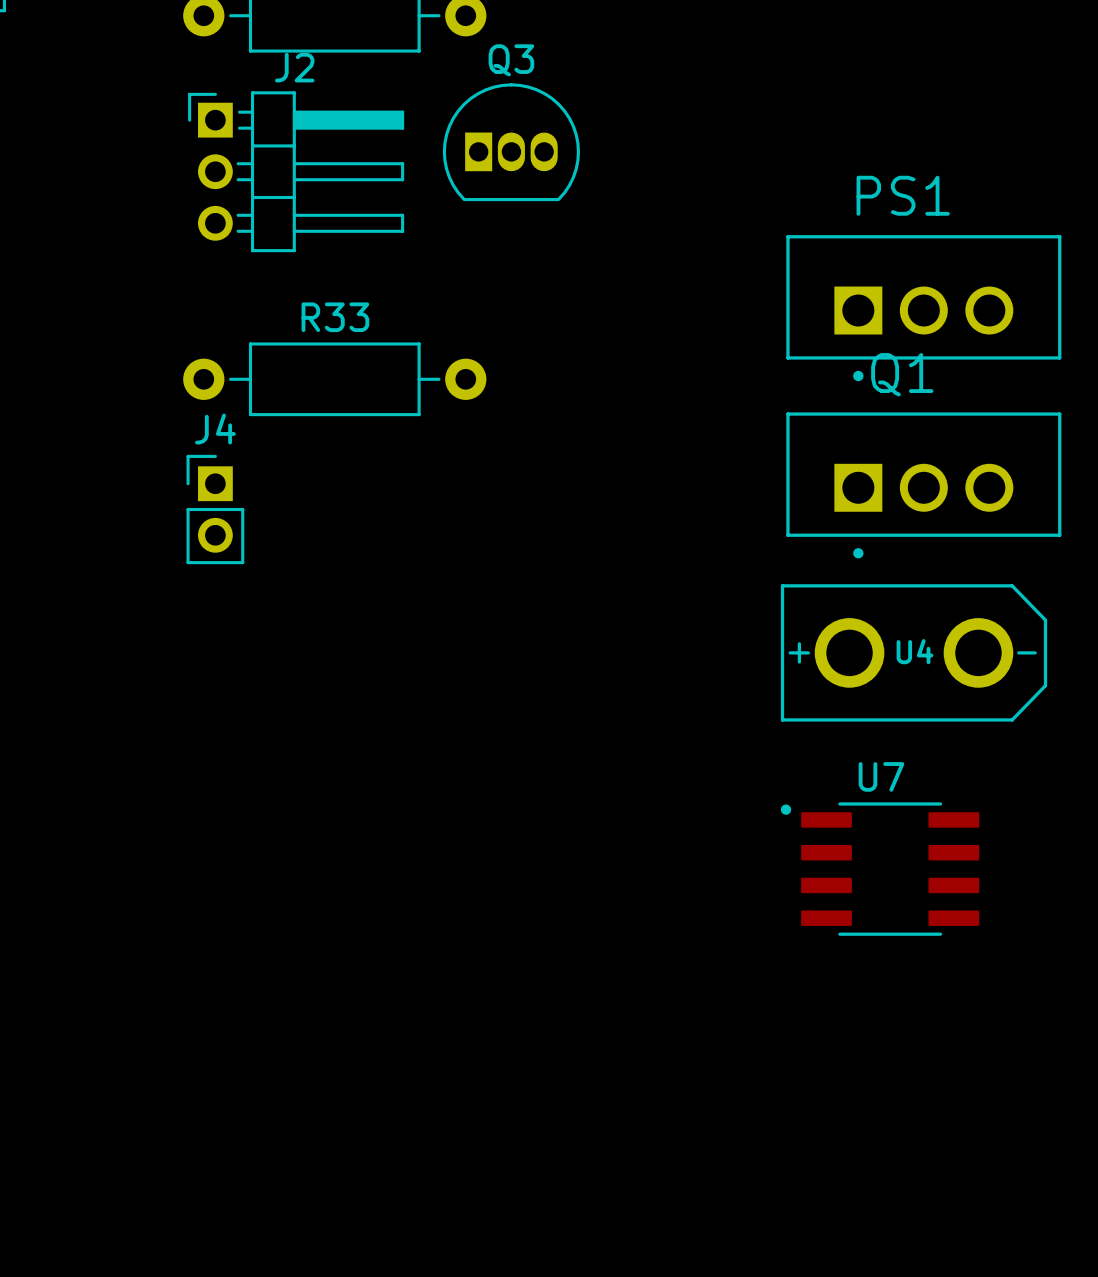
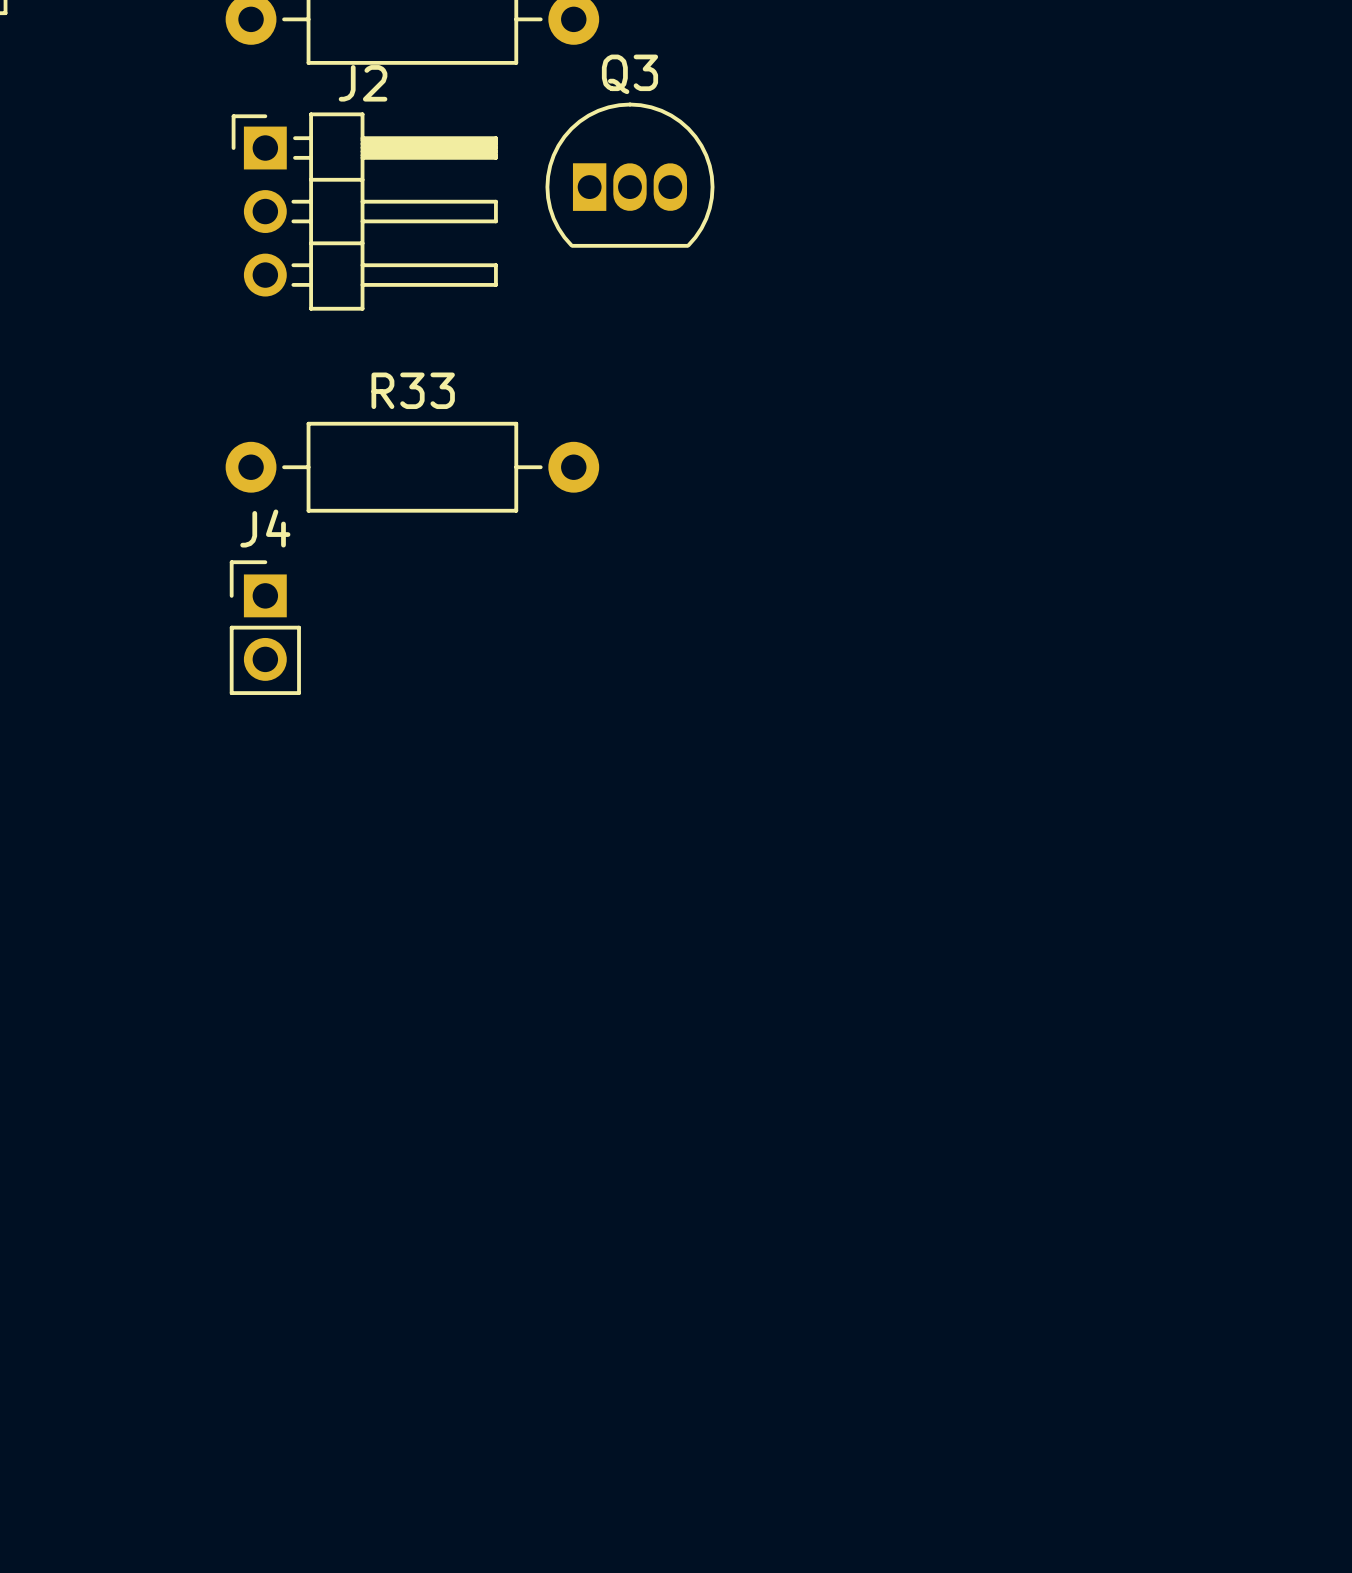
PS1: (923, 308) -> none
Q1: (923, 485) -> none
U4: (914, 652) -> none
U7: (880, 869) -> none

